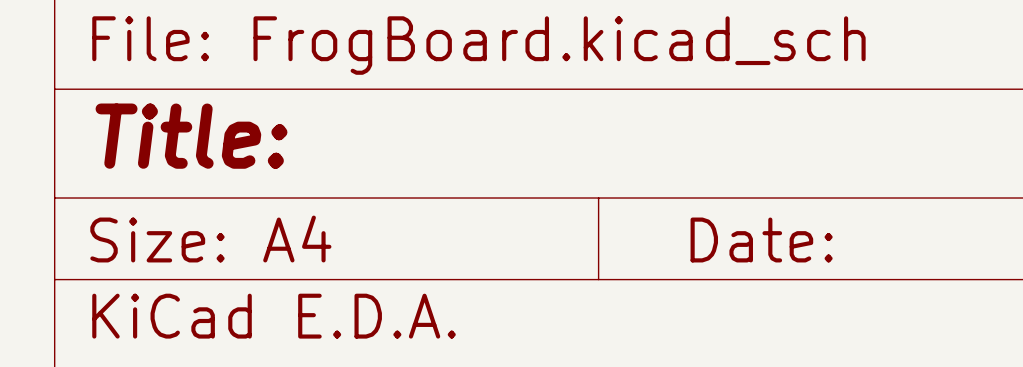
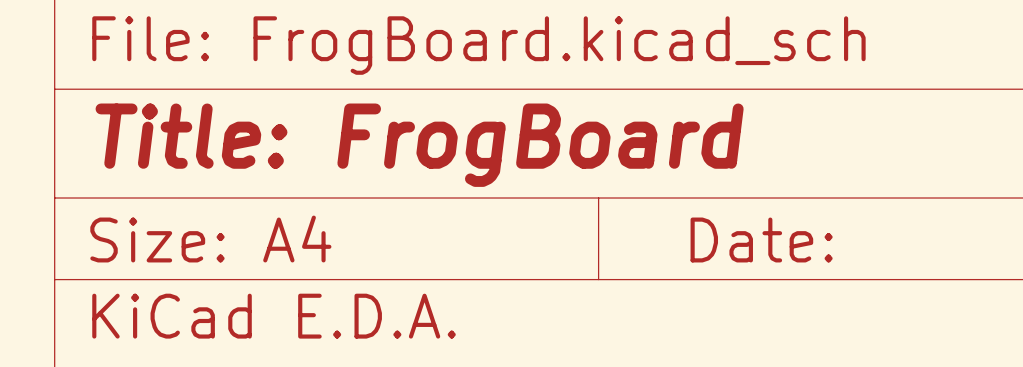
title block: Title: (191, 136) -> Title: FrogBoard (419, 145)

